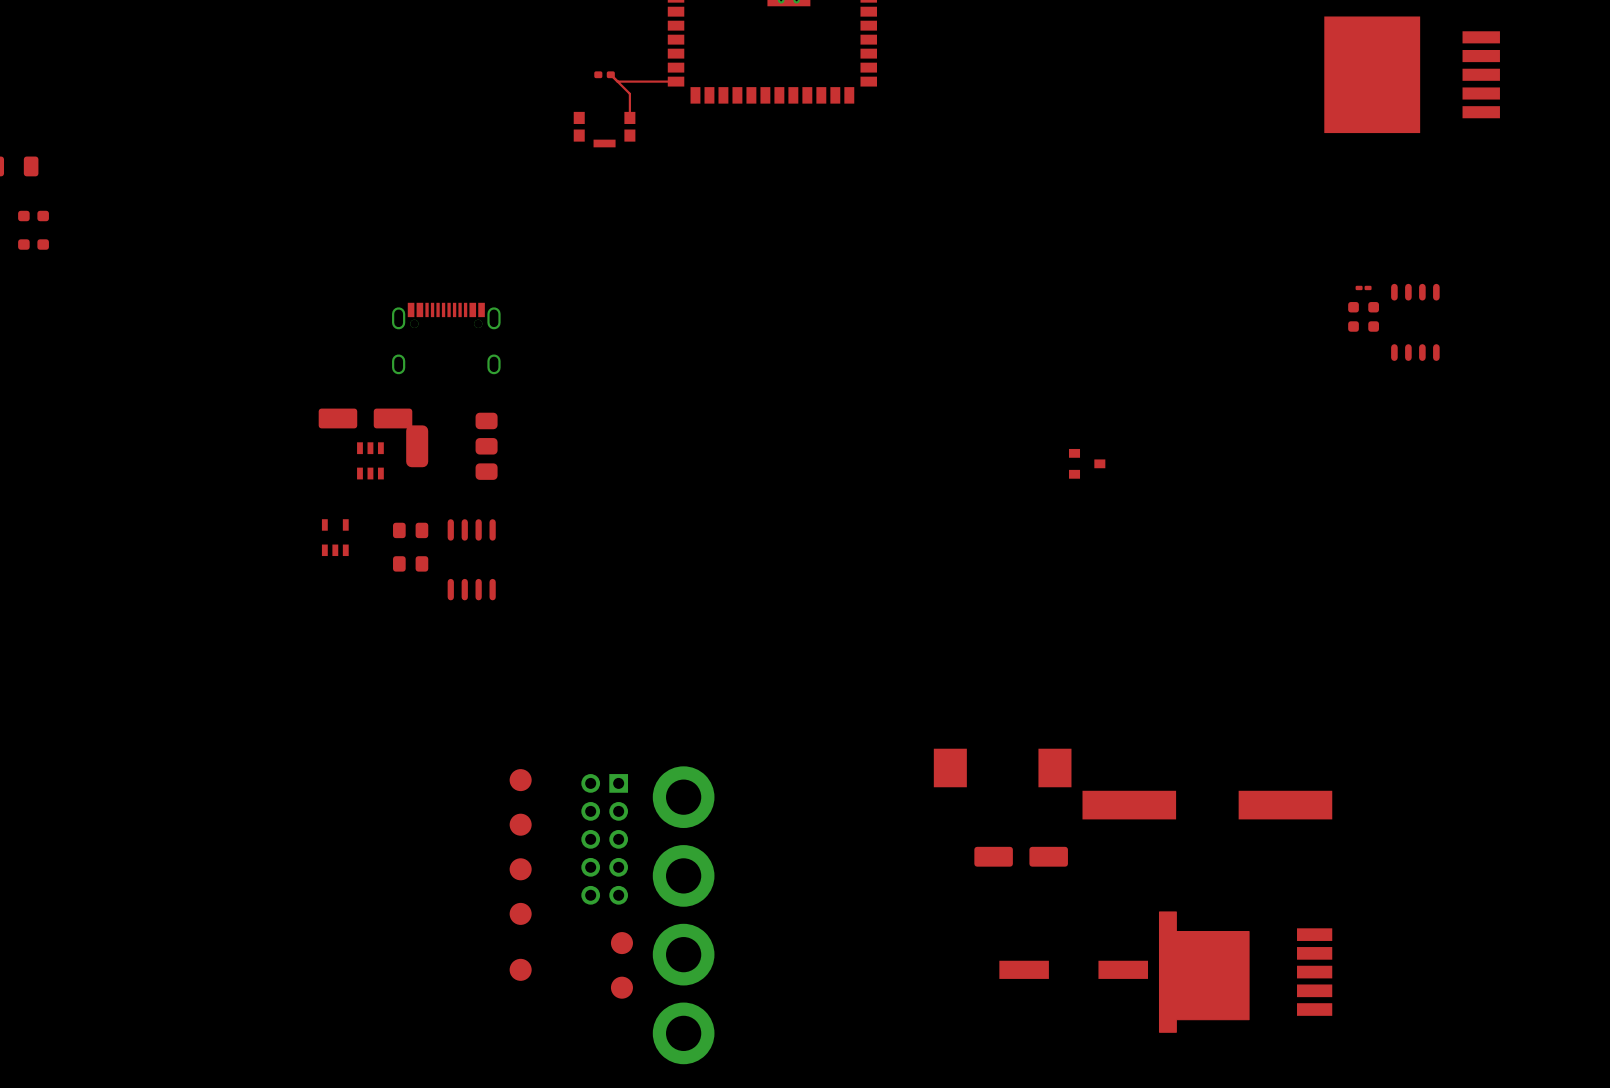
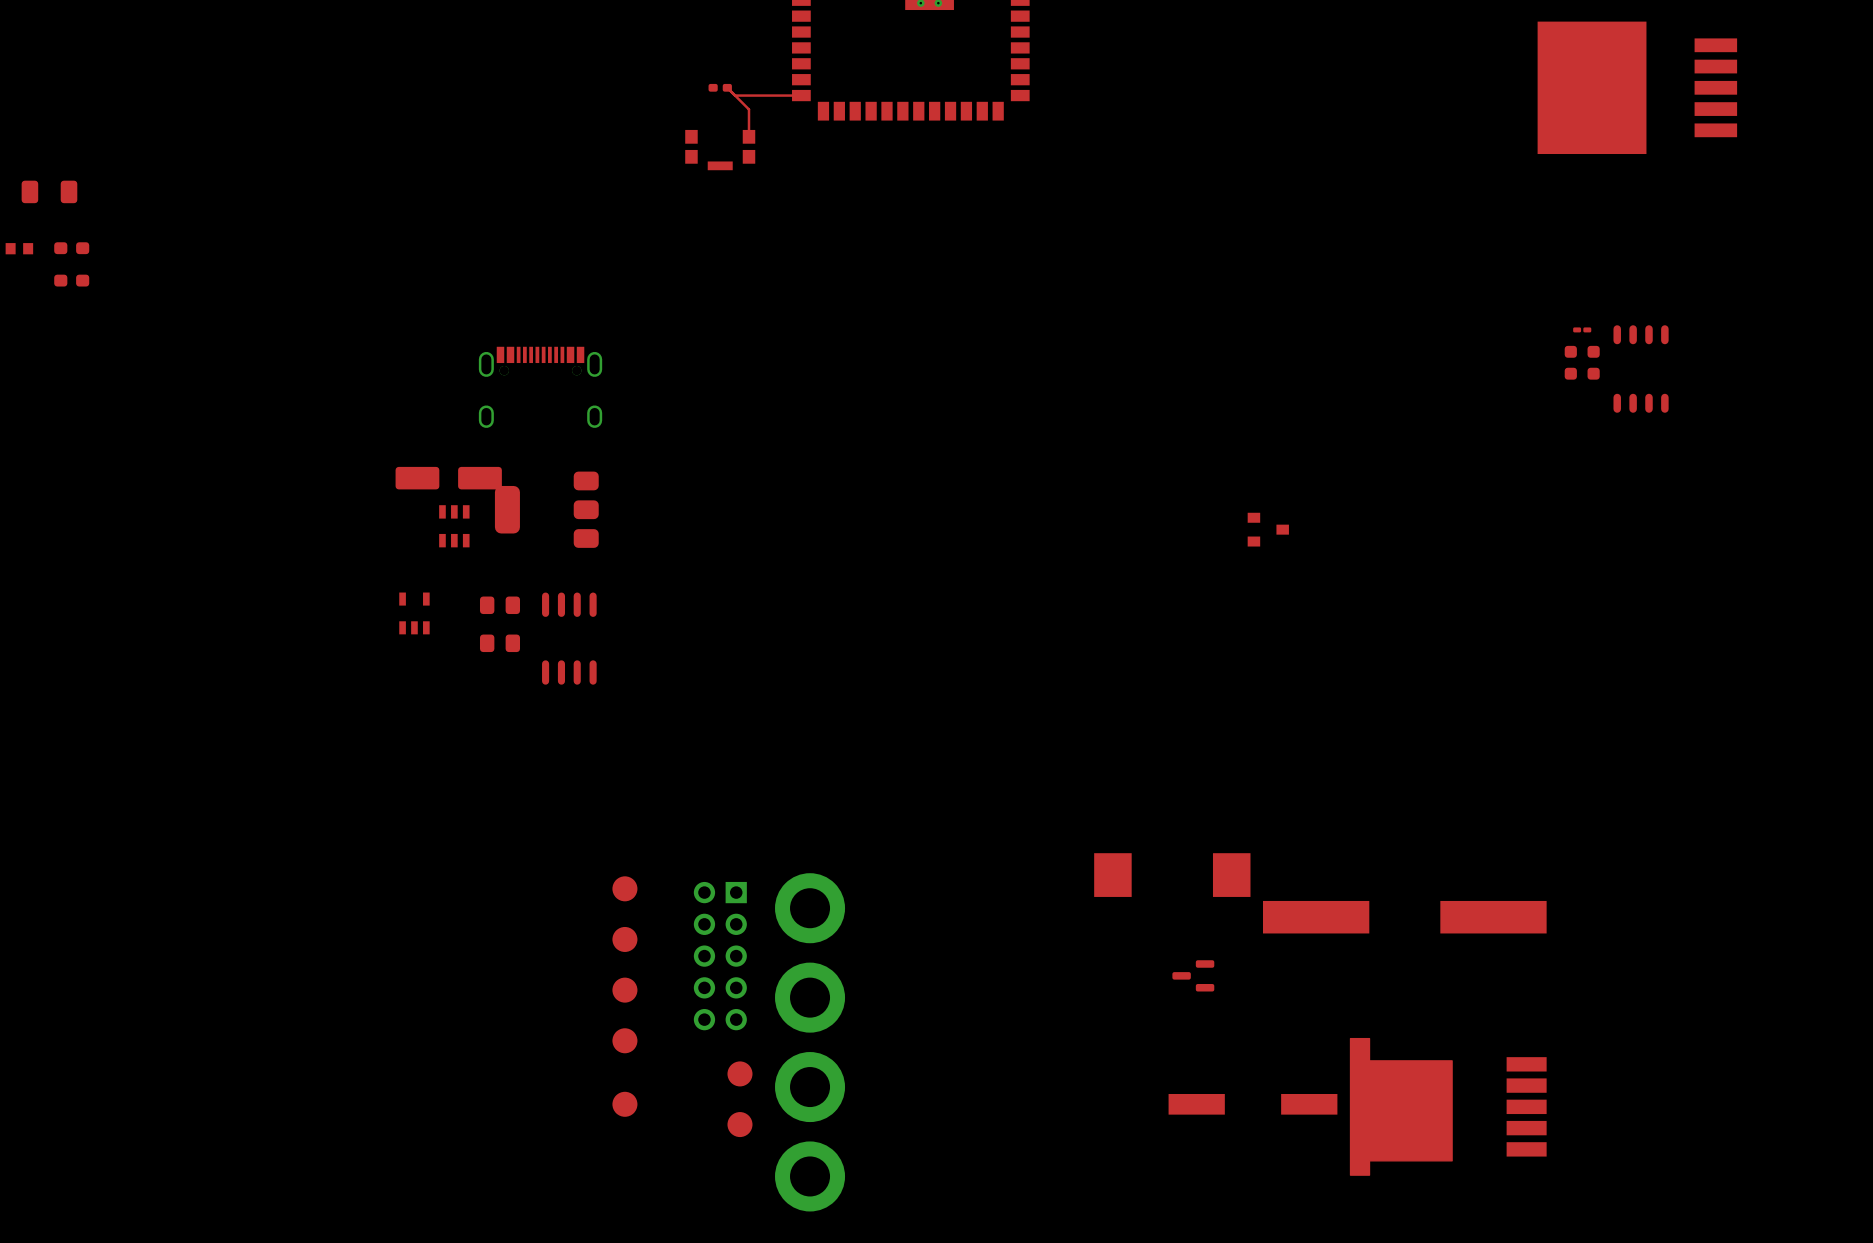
part footprint: [974, 846, 1068, 867] -> [1172, 960, 1215, 992]

